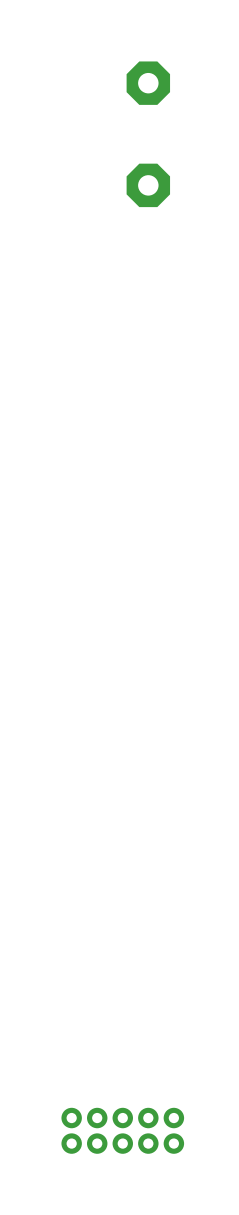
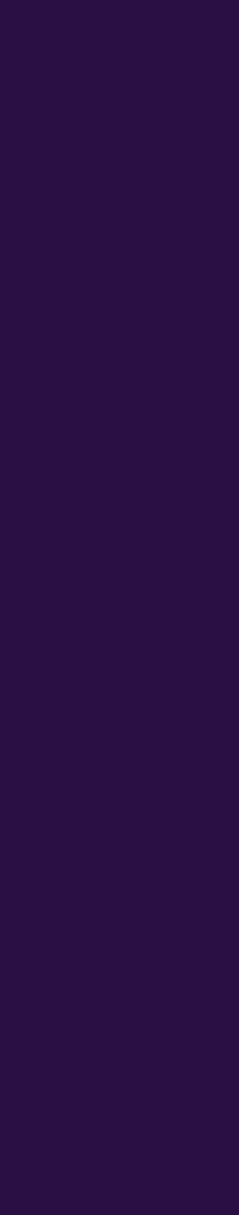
part: (148, 83) -> none
part: (148, 185) -> none
part: (122, 1130) -> none

